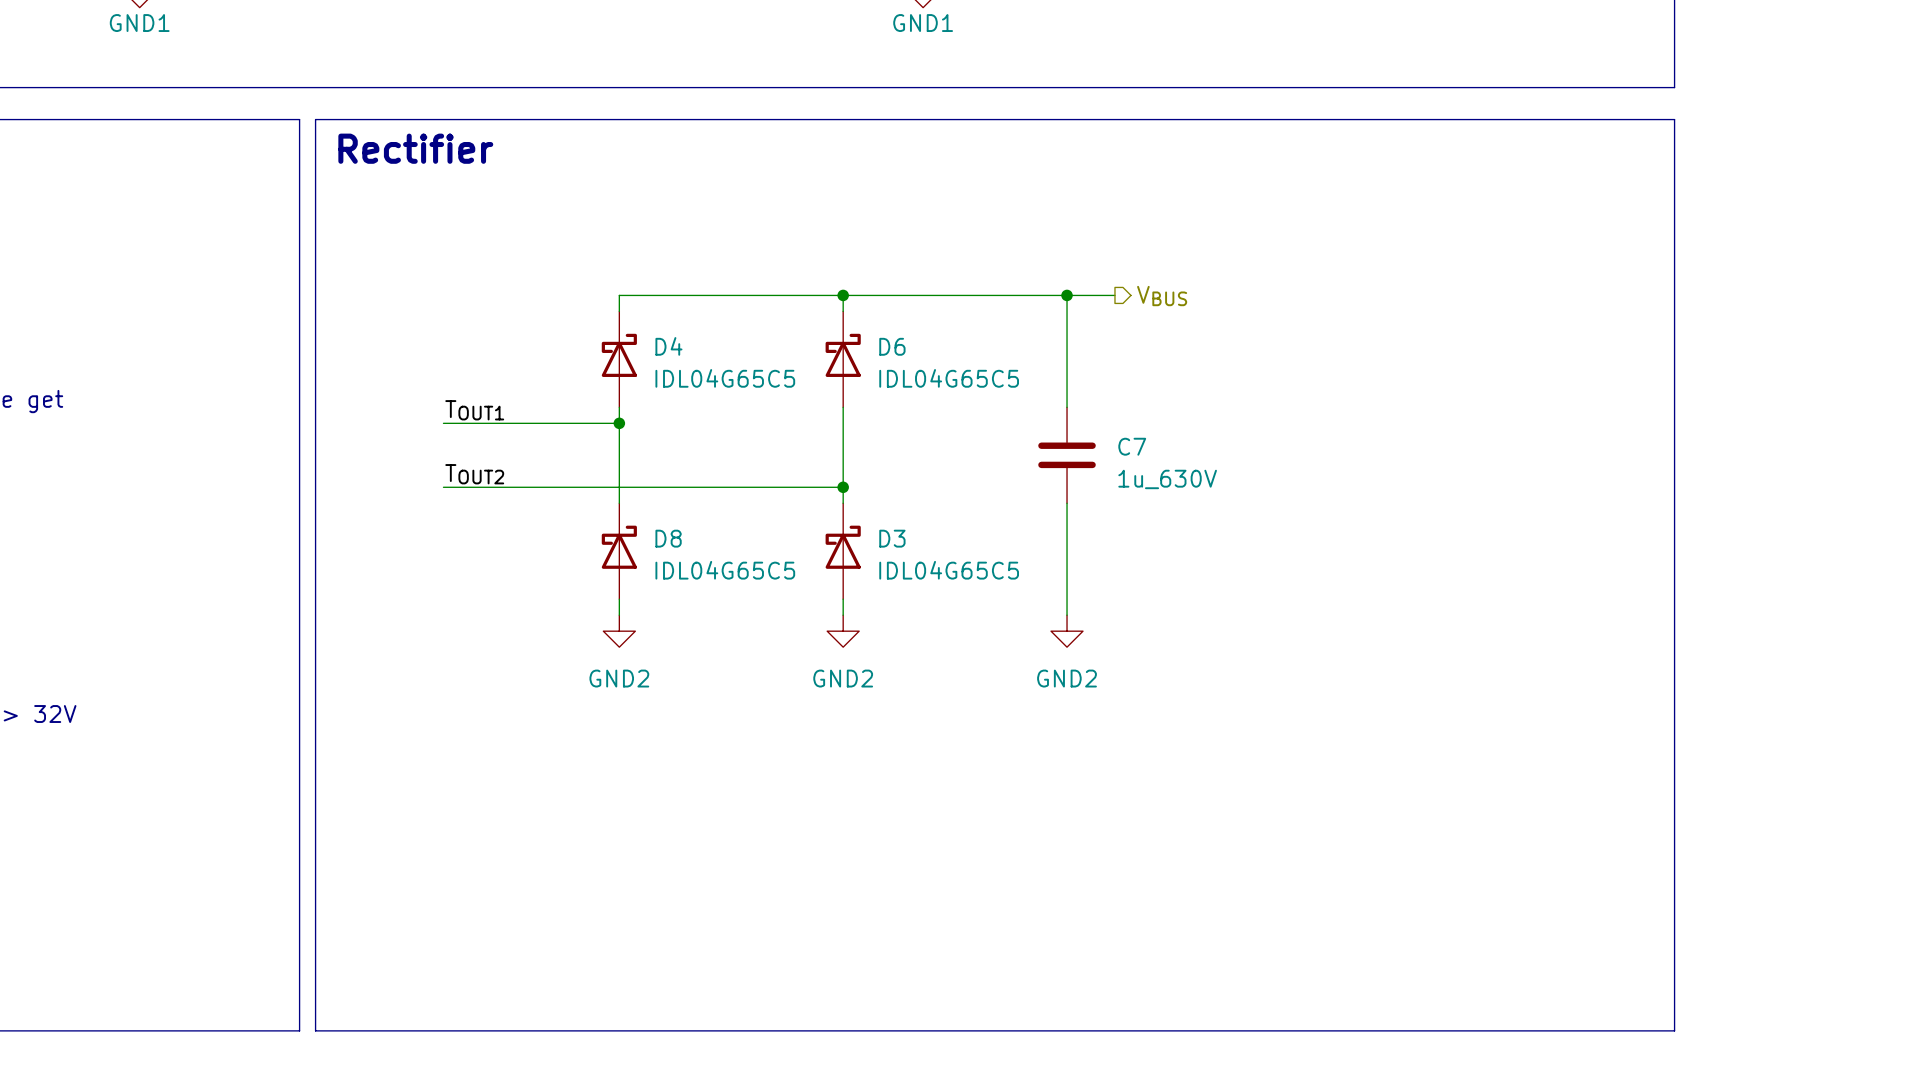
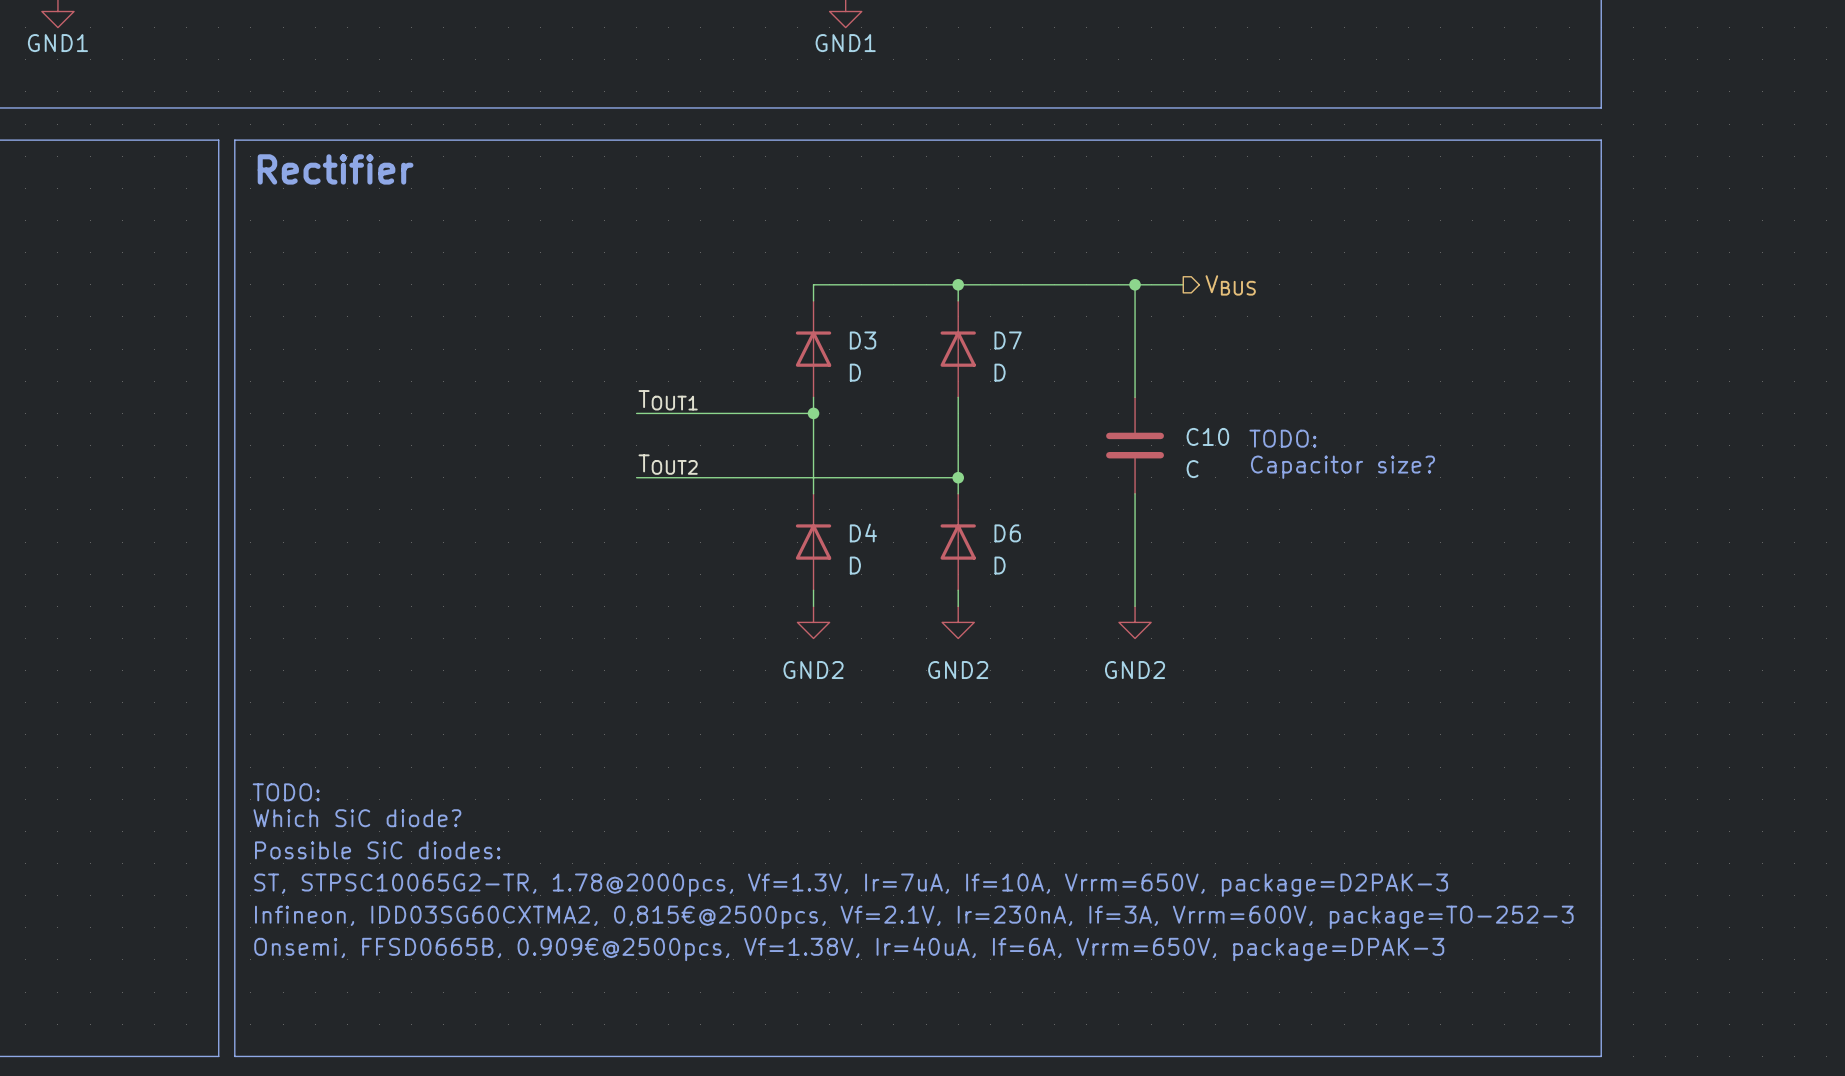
junction: none -> (1135, 284)
wire: none -> (1183, 284) (813, 284) (813, 300)
wire: (843, 295) (843, 311) -> (958, 284) (958, 300)
junction: (843, 295) -> none
wire: (1067, 295) (1067, 407) -> (1135, 284) (1135, 397)
junction position: (1067, 295) -> (958, 284)
wire: (1114, 295) (619, 295) (619, 311) -> none
hierarchical label position: VBUS (1162, 296) -> VBUS (1230, 285)
D4 symbol: [601, 311, 637, 408] -> [795, 493, 832, 591]
D6 symbol: [825, 311, 861, 408] -> [940, 493, 976, 591]
D7: none -> D (958, 349)
D4 value: IDL04G65C5 (725, 378) -> D (855, 565)
D6 value: IDL04G65C5 (949, 378) -> D (1000, 565)
junction: none -> (813, 413)
wire: (619, 407) (619, 503) -> (813, 397) (813, 493)
wire: (843, 407) (843, 503) -> (958, 397) (958, 493)
label position: TOUT1 (474, 410) -> TOUT1 (668, 400)
text: none -> TODO: (1282, 438)
wire: (443, 423) (619, 423) -> (636, 413) (813, 413)
junction: (619, 423) -> none
C10: none -> C (1135, 445)
text: none -> Capacitor size? (1343, 467)
wire: none -> (636, 477) (958, 477)
junction: none -> (958, 477)
C7: 1u_630V (1067, 455) -> none
label position: TOUT2 (474, 474) -> TOUT2 (668, 464)
wire: (443, 487) (843, 487) -> none
junction: (843, 487) -> none
D3 symbol: [825, 503, 861, 600] -> [795, 300, 832, 398]
wire: (1067, 503) (1067, 615) -> (1135, 493) (1135, 606)
D8: IDL04G65C5 (619, 551) -> none
D3 value: IDL04G65C5 (949, 570) -> D (855, 372)
wire: (619, 599) (619, 615) -> (813, 590) (813, 606)
wire: (843, 599) (843, 615) -> (958, 590) (958, 606)
power symbol: none -> GND2 (1135, 622)
power symbol: GND2 (619, 631) -> none
power symbol position: GND2 (843, 631) -> GND2 (813, 622)
power symbol position: GND2 (1067, 631) -> GND2 (958, 622)
text: none -> TODO: (286, 792)
text: none -> Which SiC diode? (357, 818)
text: none -> Possible SiC diodes: (377, 850)
text: none -> ST, STPSC10065G2-TR, 1.78@2000pcs, Vf=1.3V, Ir=7uA, If=10A, Vrrm=650V, package=D2PAK-3 (851, 885)
text: none -> Infineon, IDD03SG60CXTMA2, 0,815€@2500pcs, Vf=2.1V, Ir=230nA, If=3A, Vrrm=600V, package=TO-252-3 (914, 917)
text: none -> Onsemi, FFSD0665B, 0.909€@2500pcs, Vf=1.38V, Ir=40uA, If=6A, Vrrm=650V, package=DPAK-3 (849, 949)

